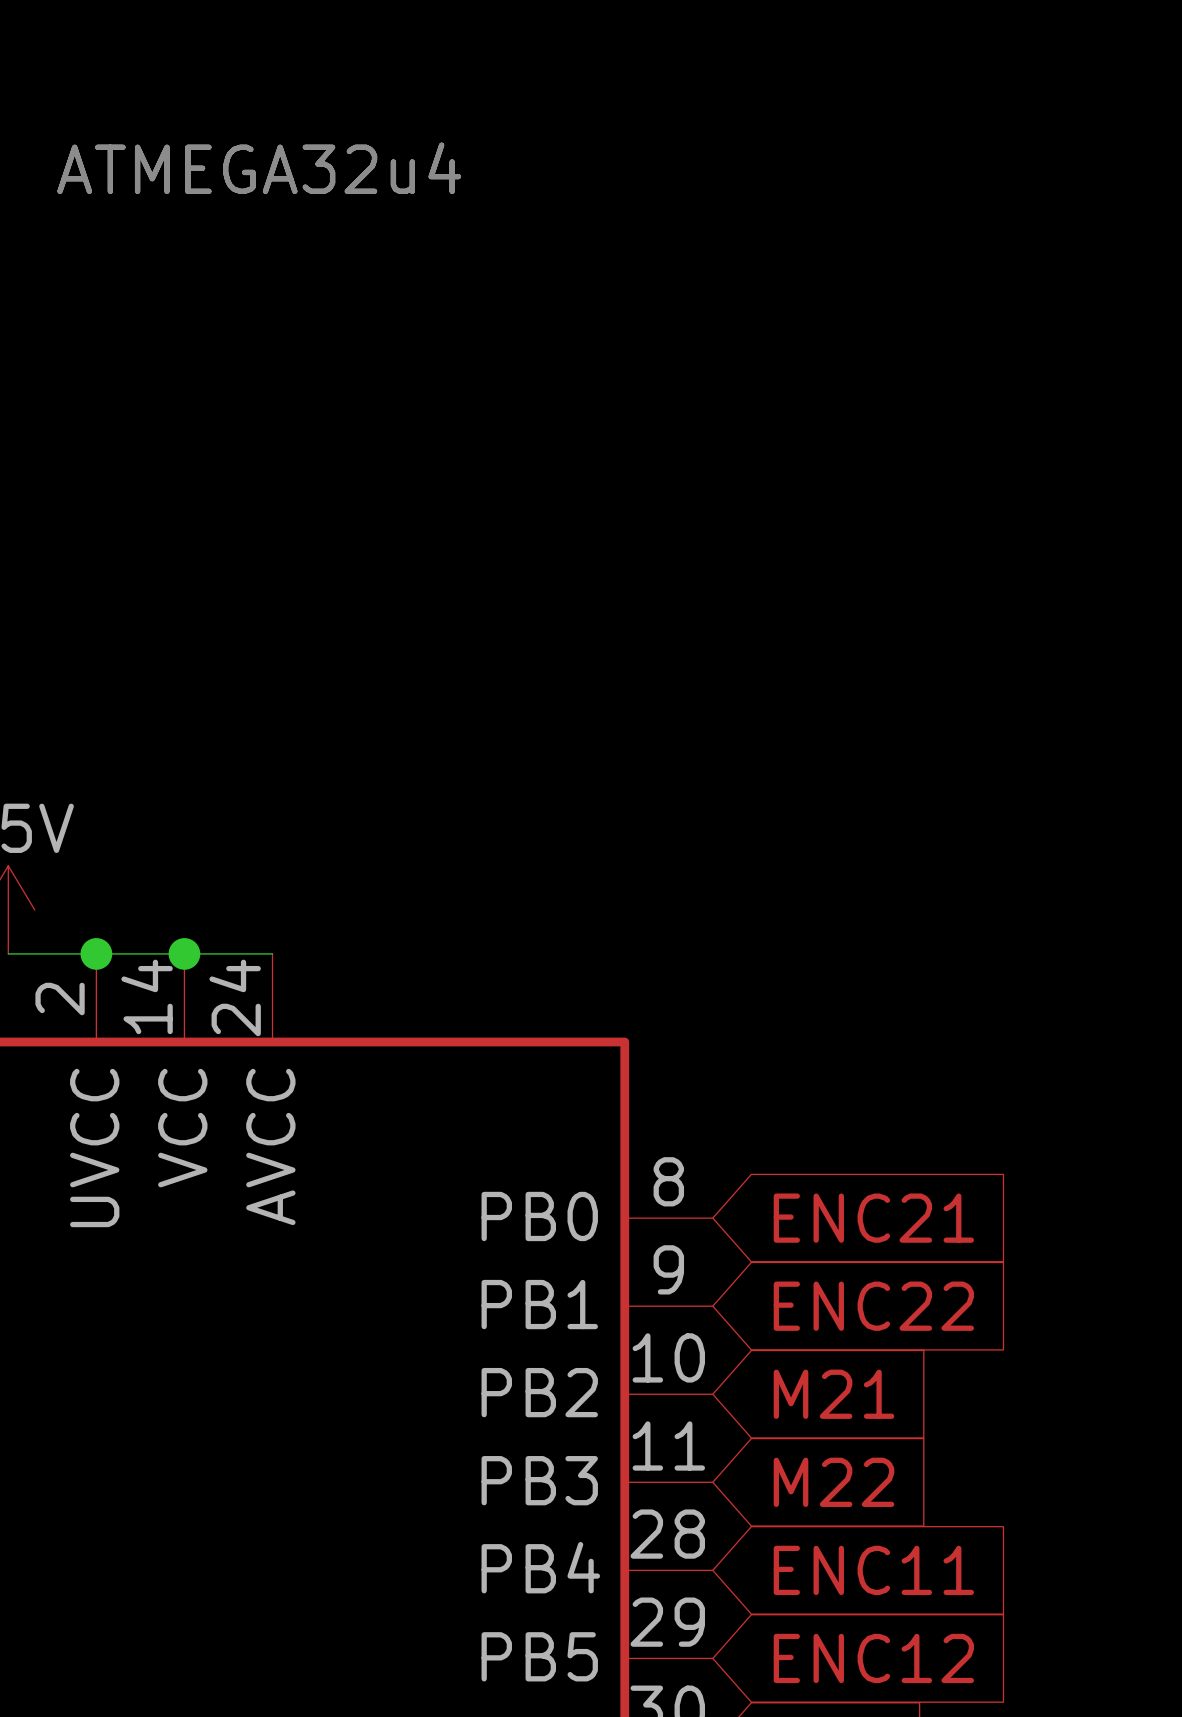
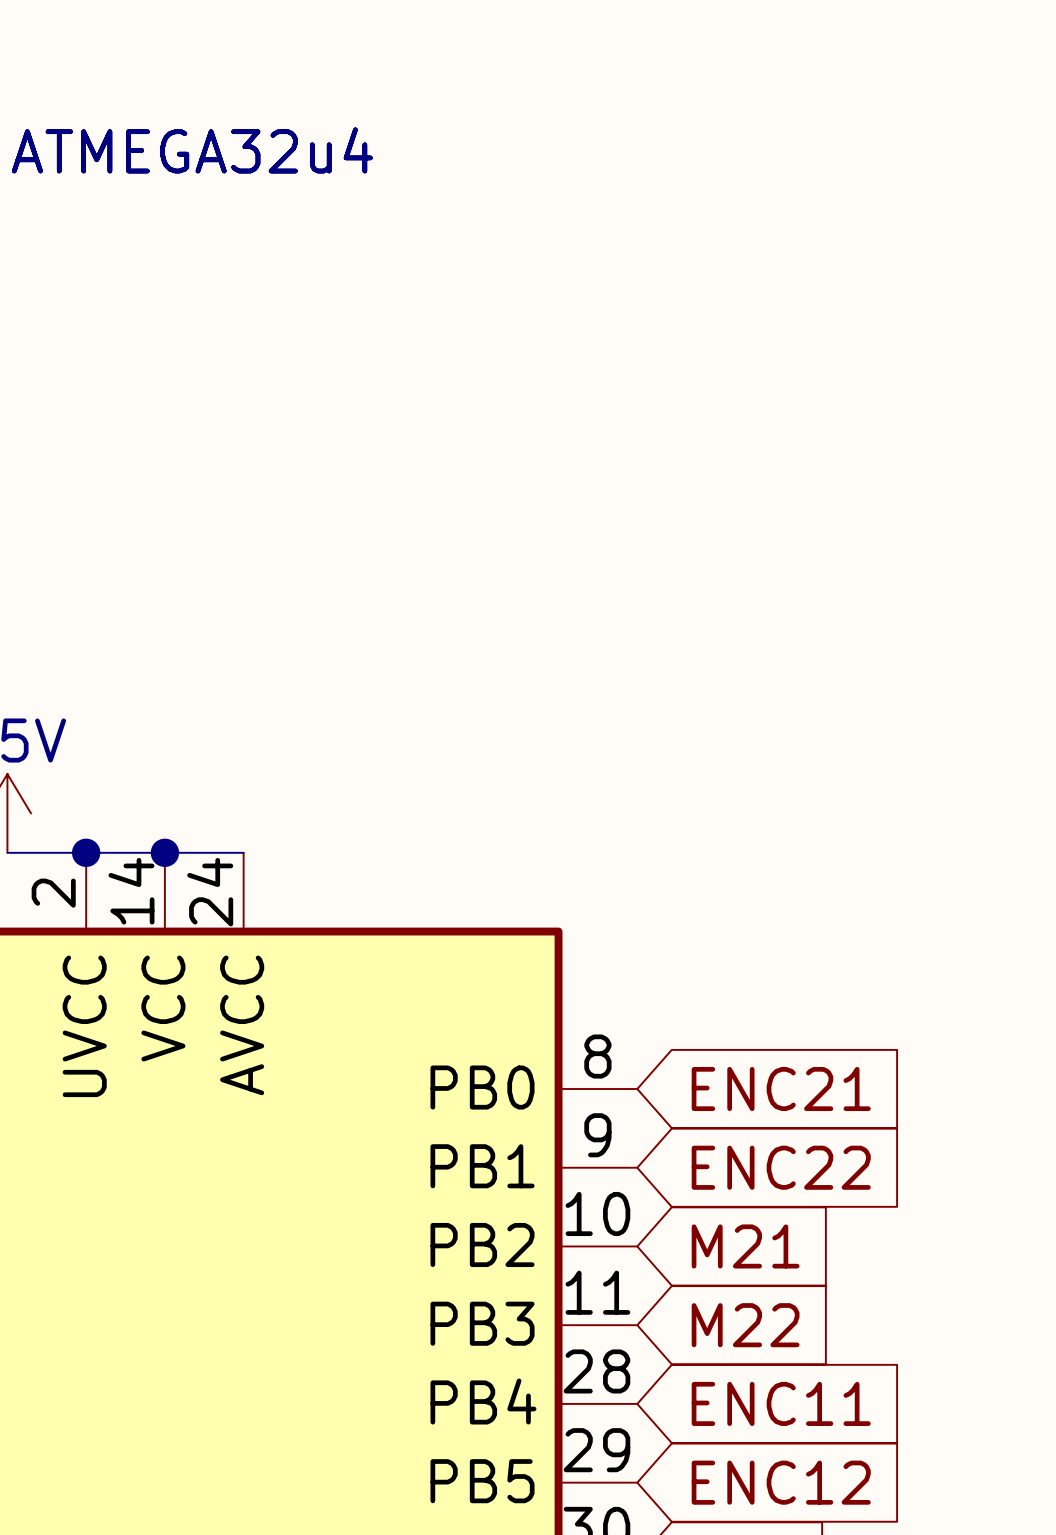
text position: ATMEGA32u4 (259, 168) -> ATMEGA32u4 (192, 150)

